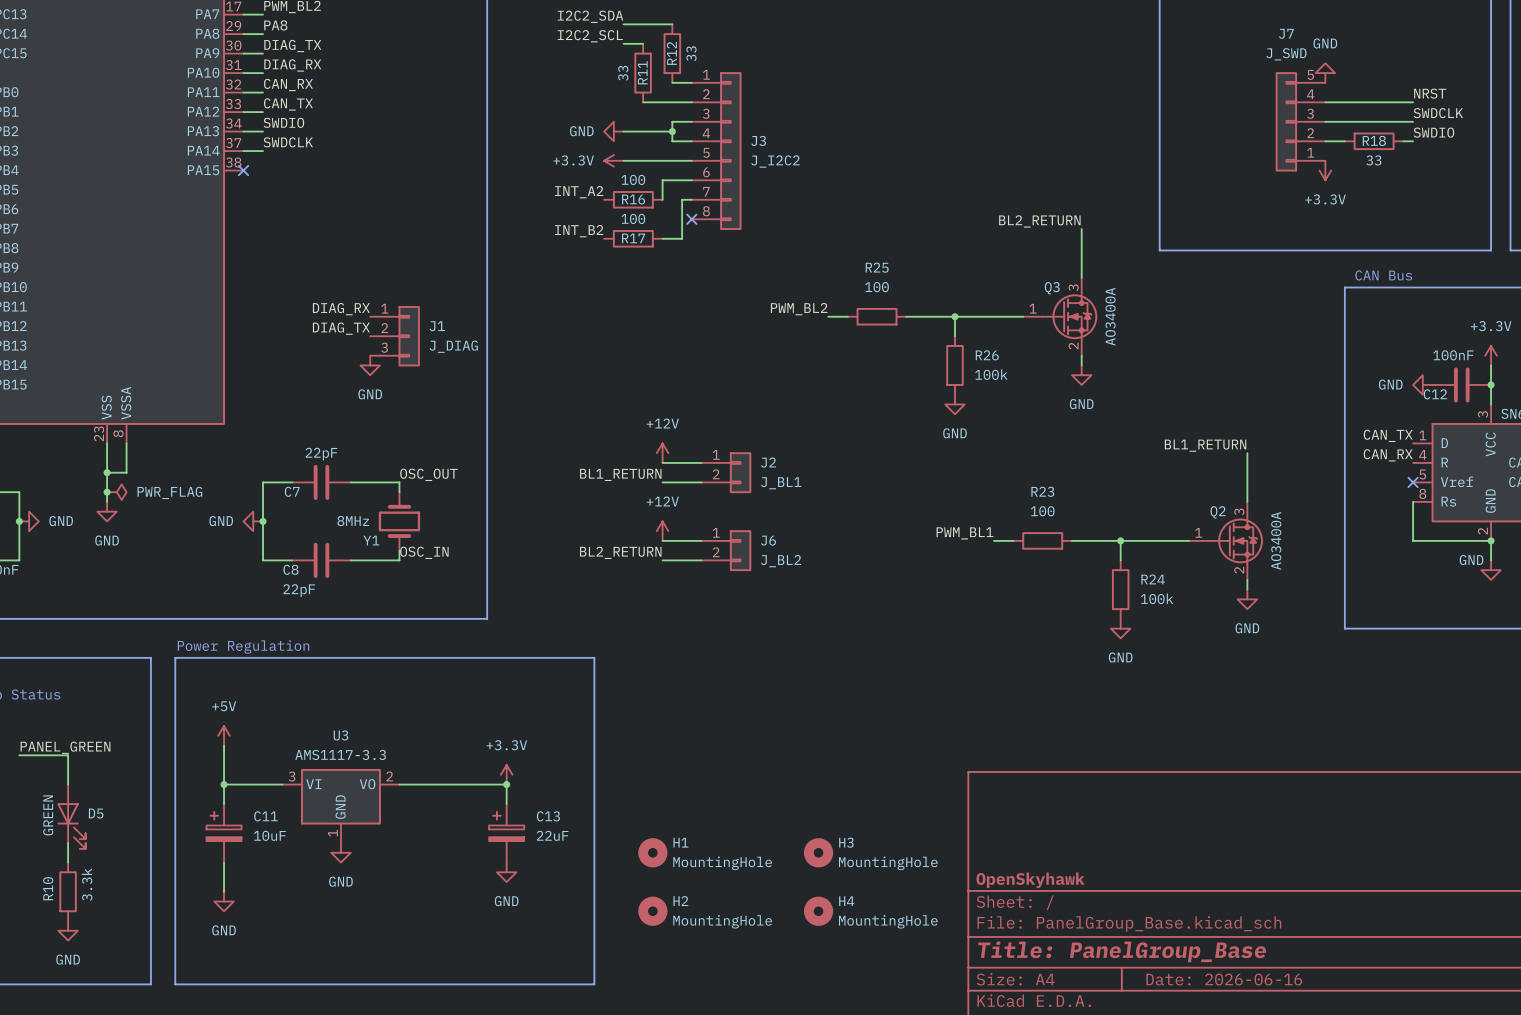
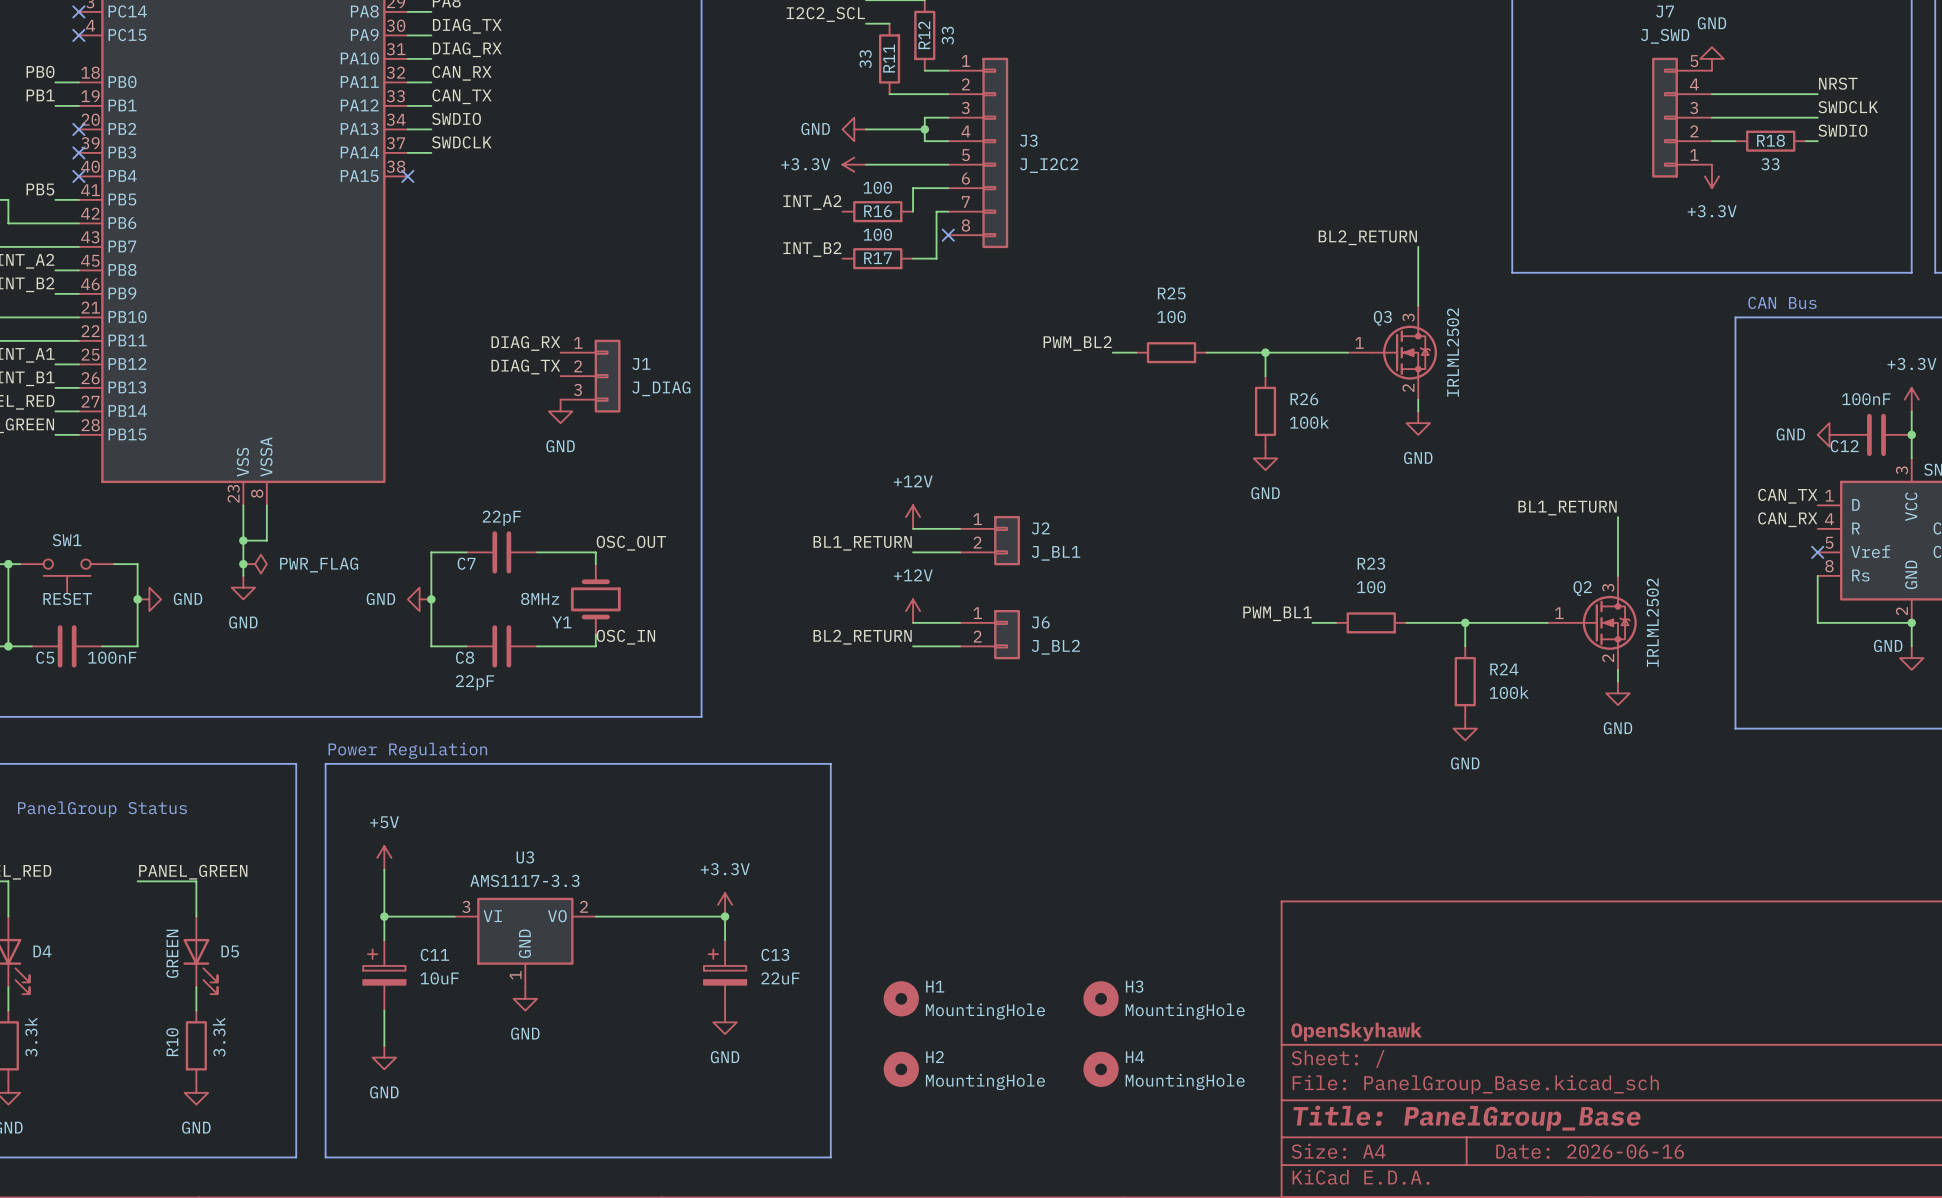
Q3 value: AO3400A (1110, 316) -> IRLML2502 (1453, 352)
Q2 value: AO3400A (1276, 540) -> IRLML2502 (1652, 622)

